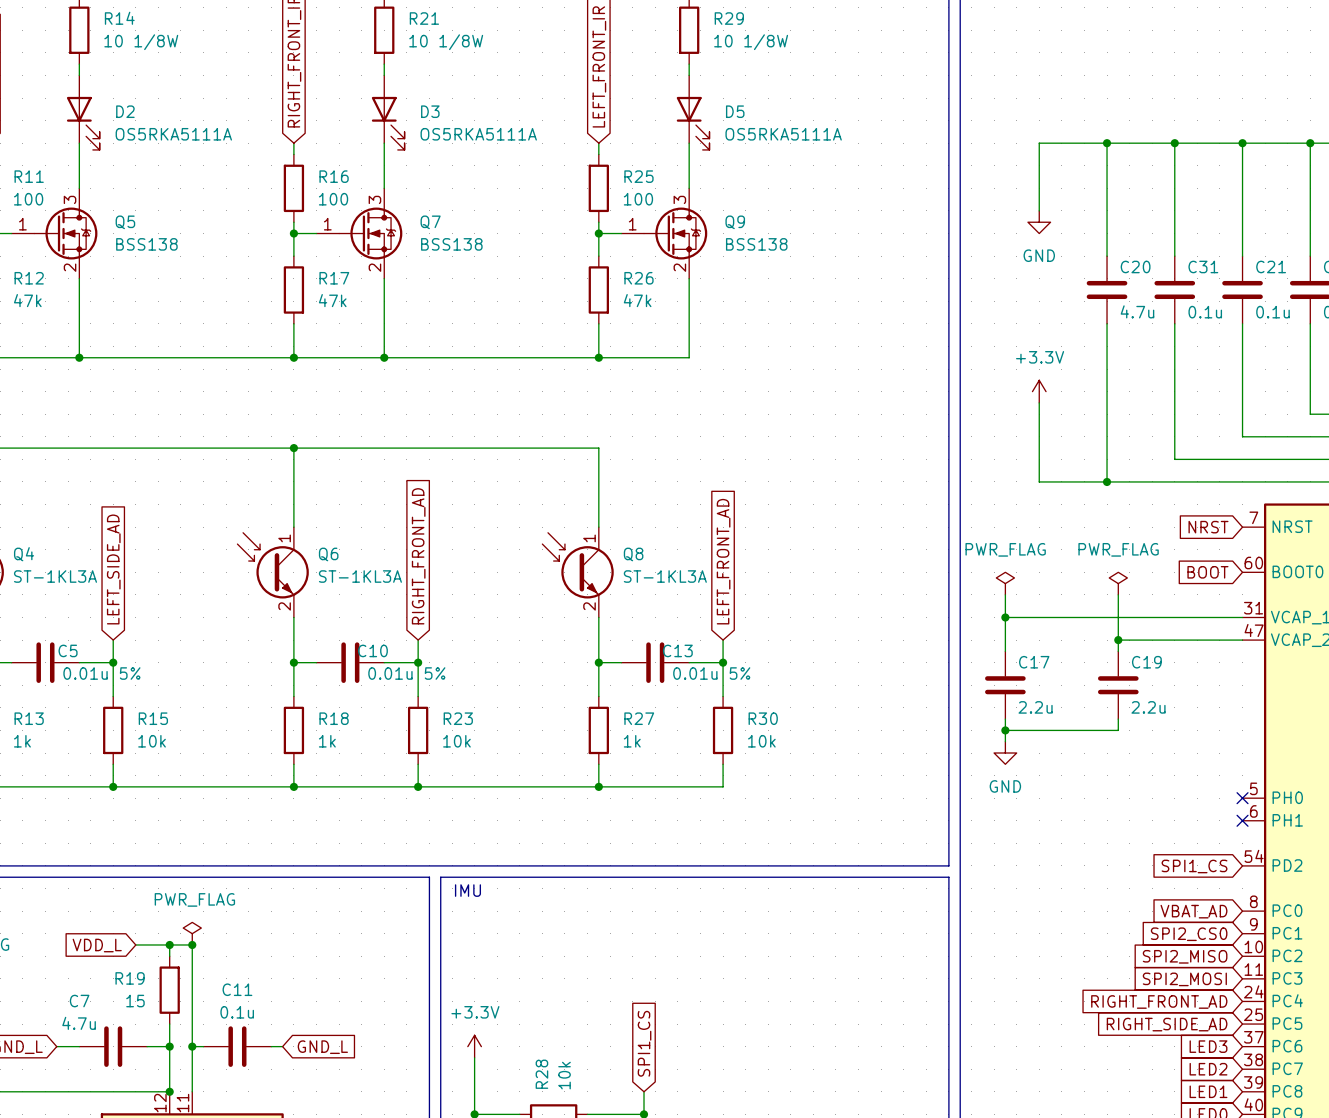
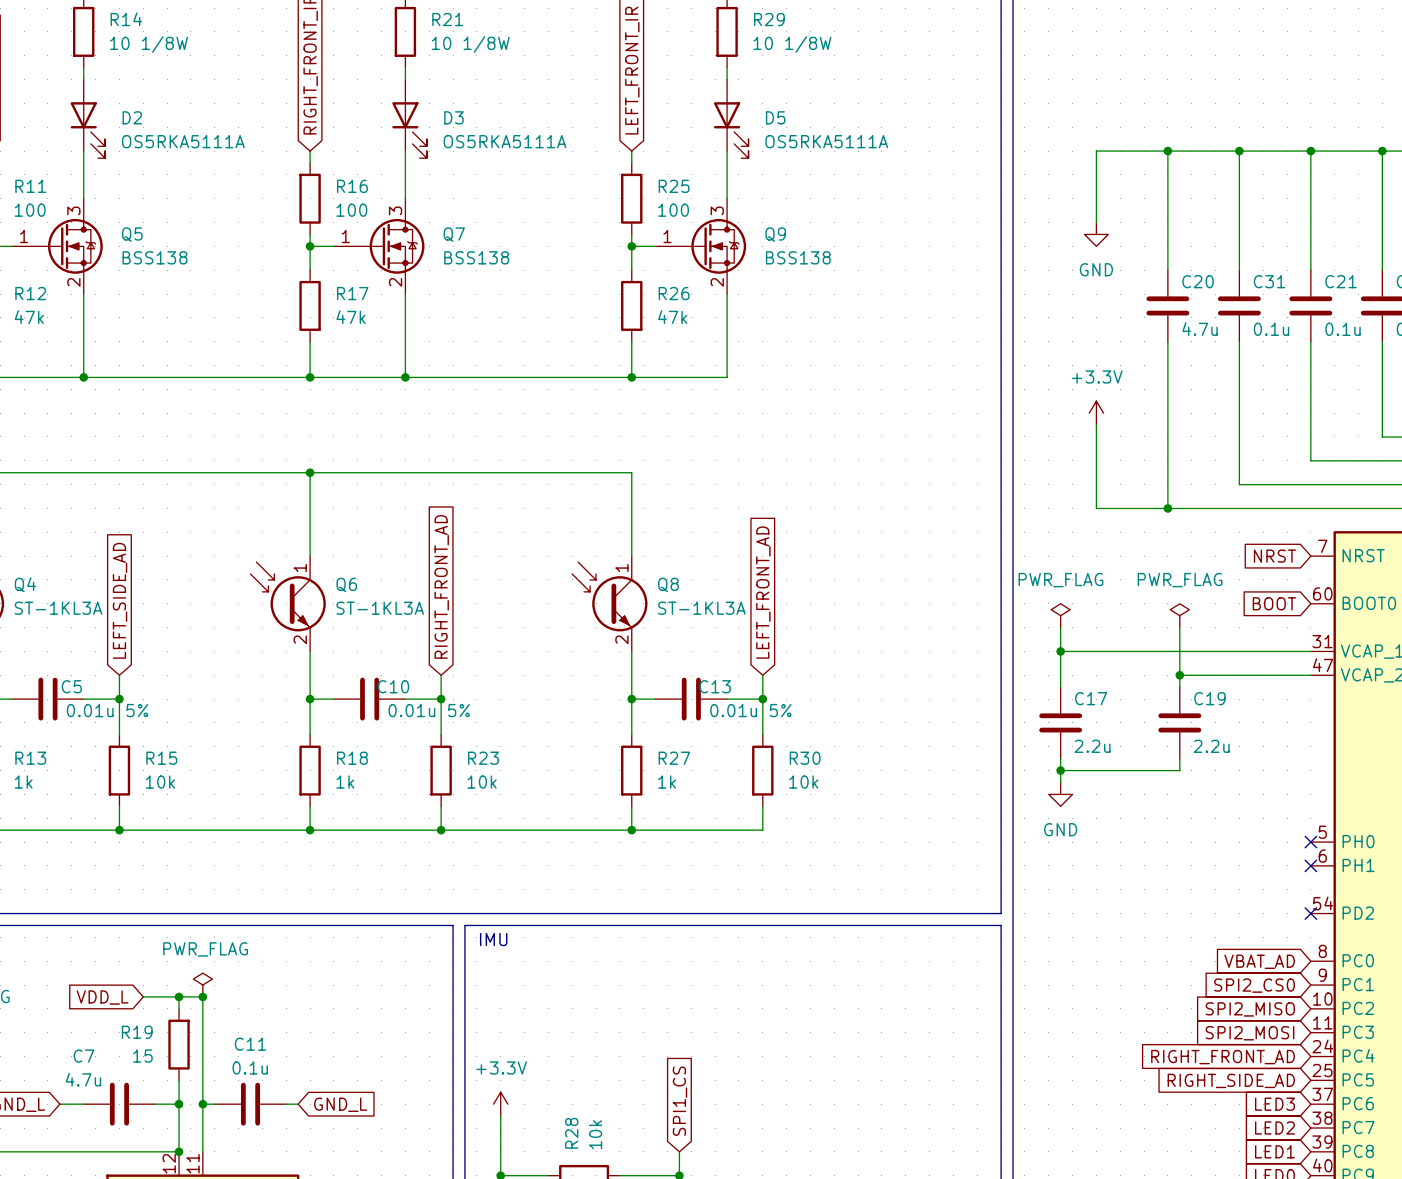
no-connect mark: none -> (1310, 913)
global label: SPI1_CS (1194, 866) -> none

